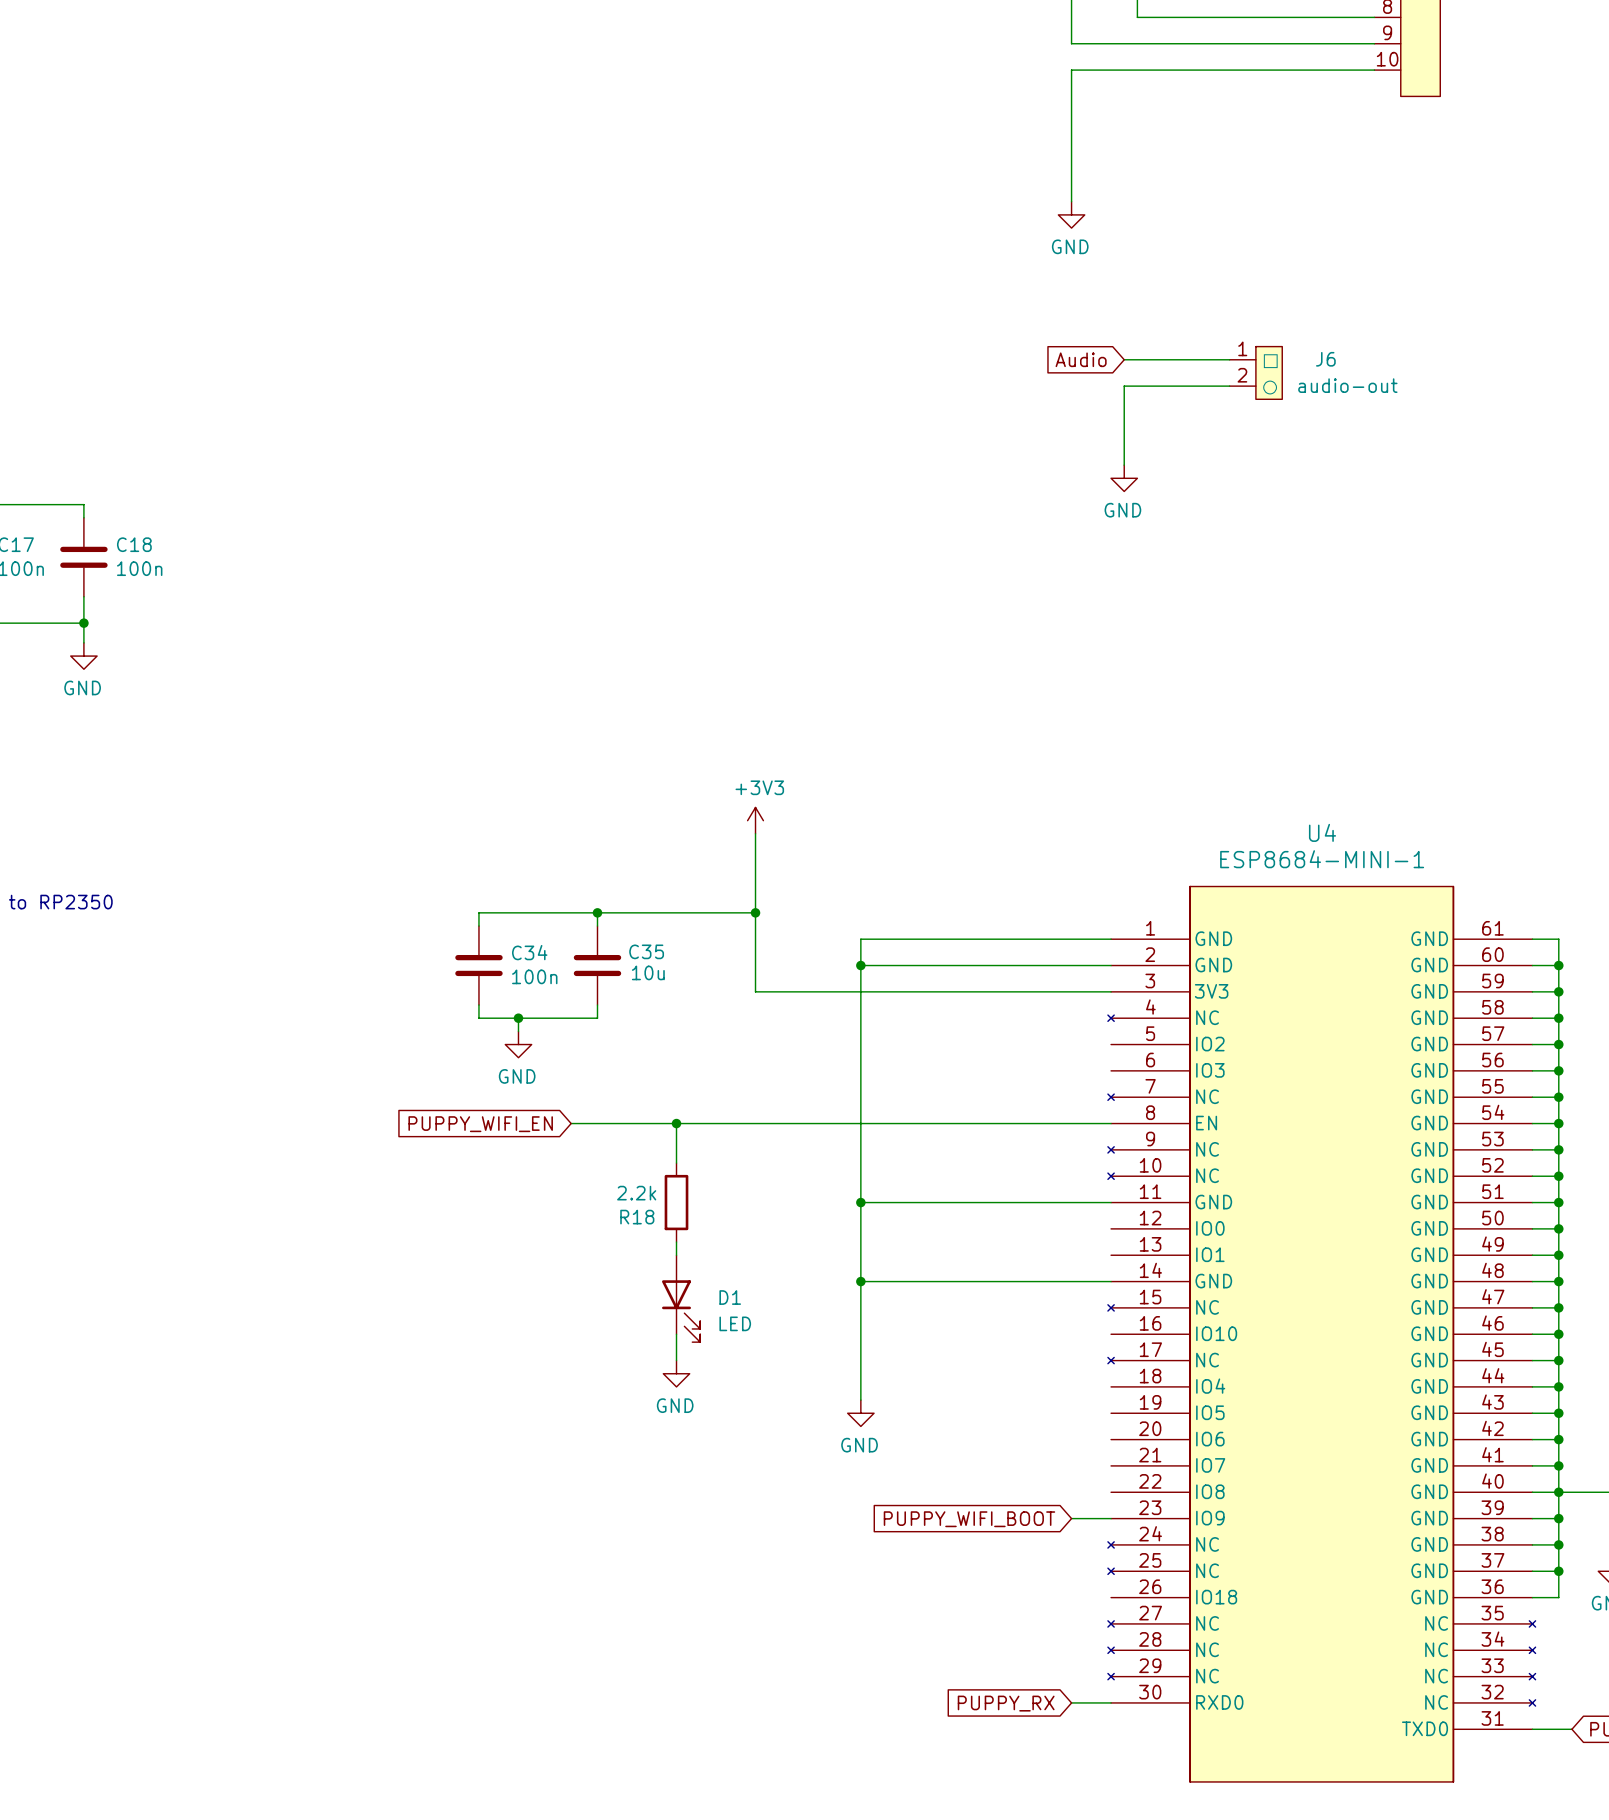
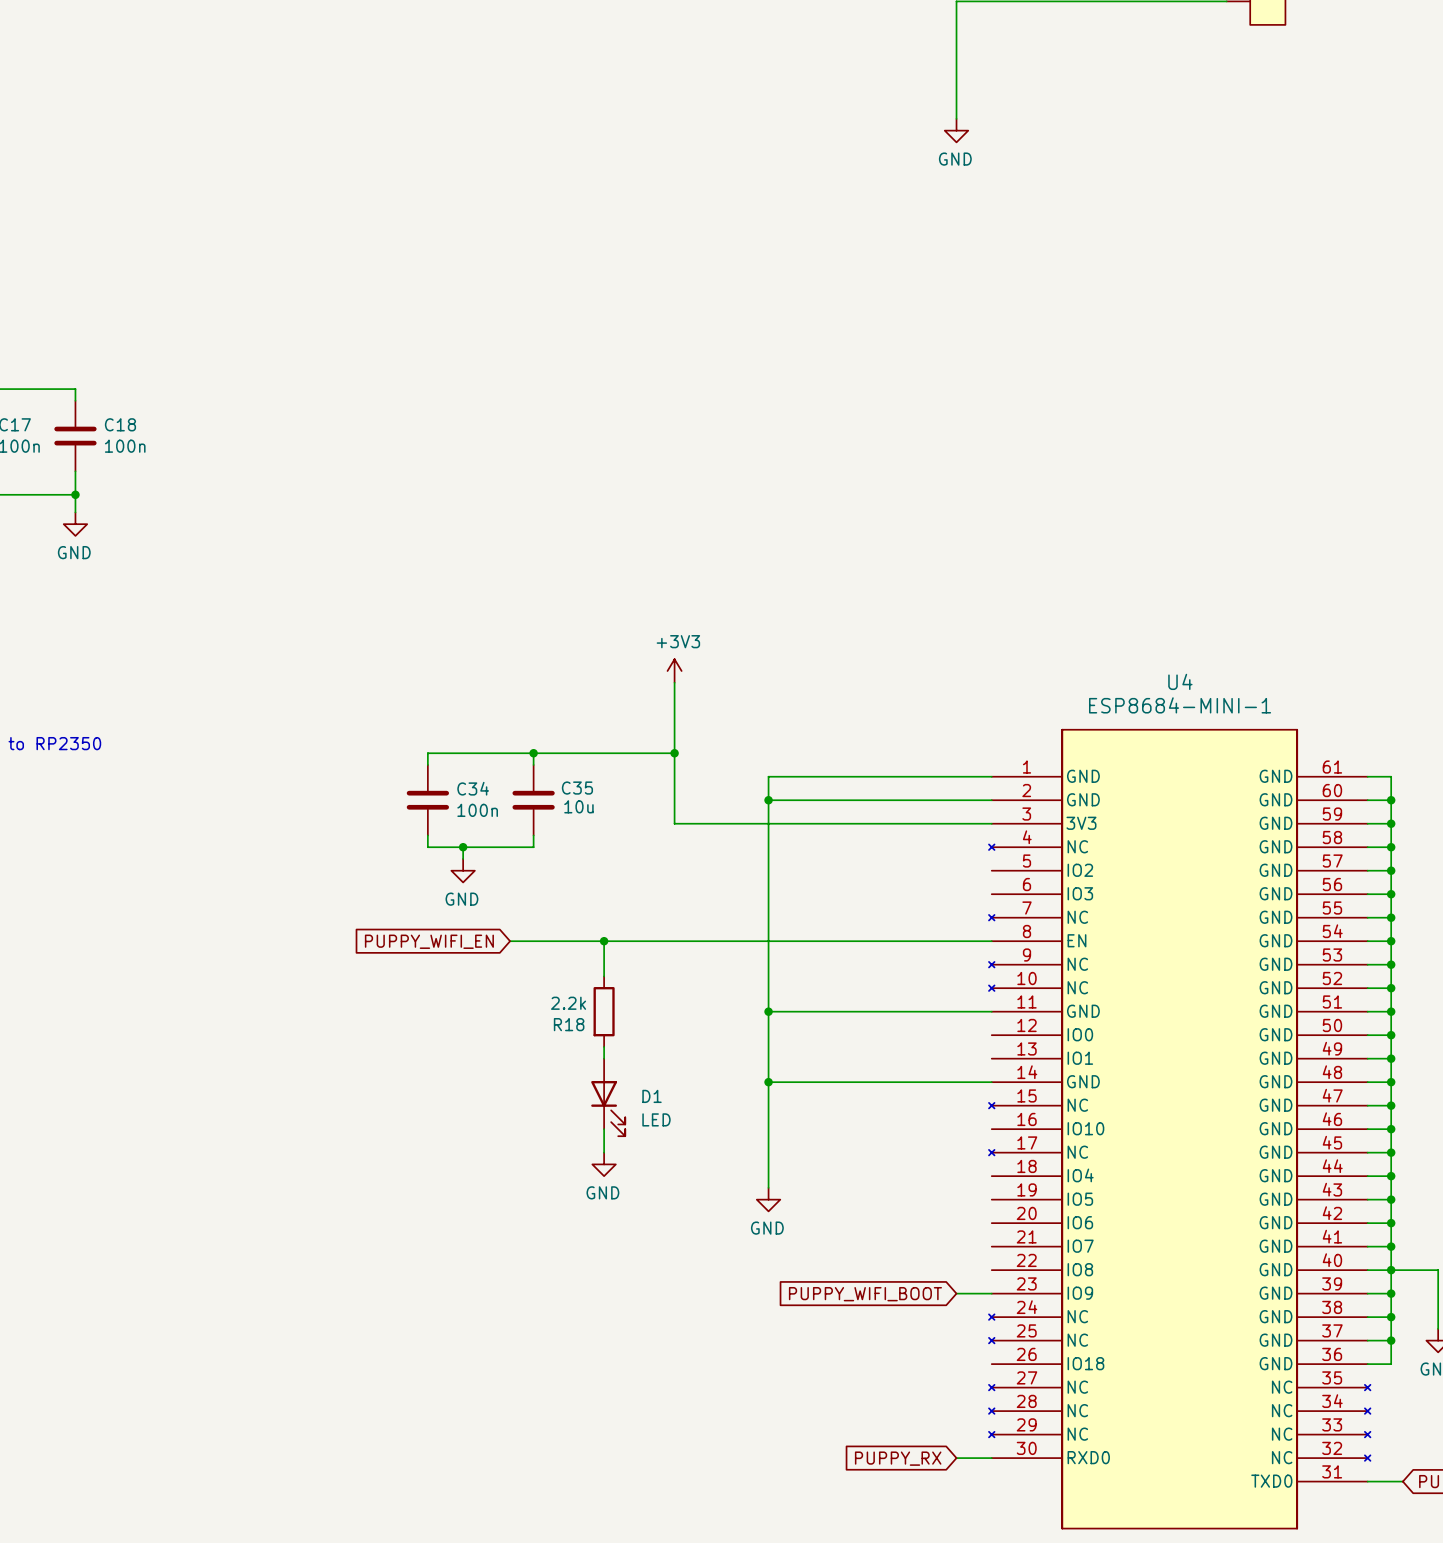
global label: Audio (1081, 359) -> none
wire: (1124, 359) (1229, 359) -> none
J6: audio-out (1255, 372) -> none
wire: (1229, 386) (1124, 386) (1124, 465) -> none
power symbol: GND (1124, 478) -> none

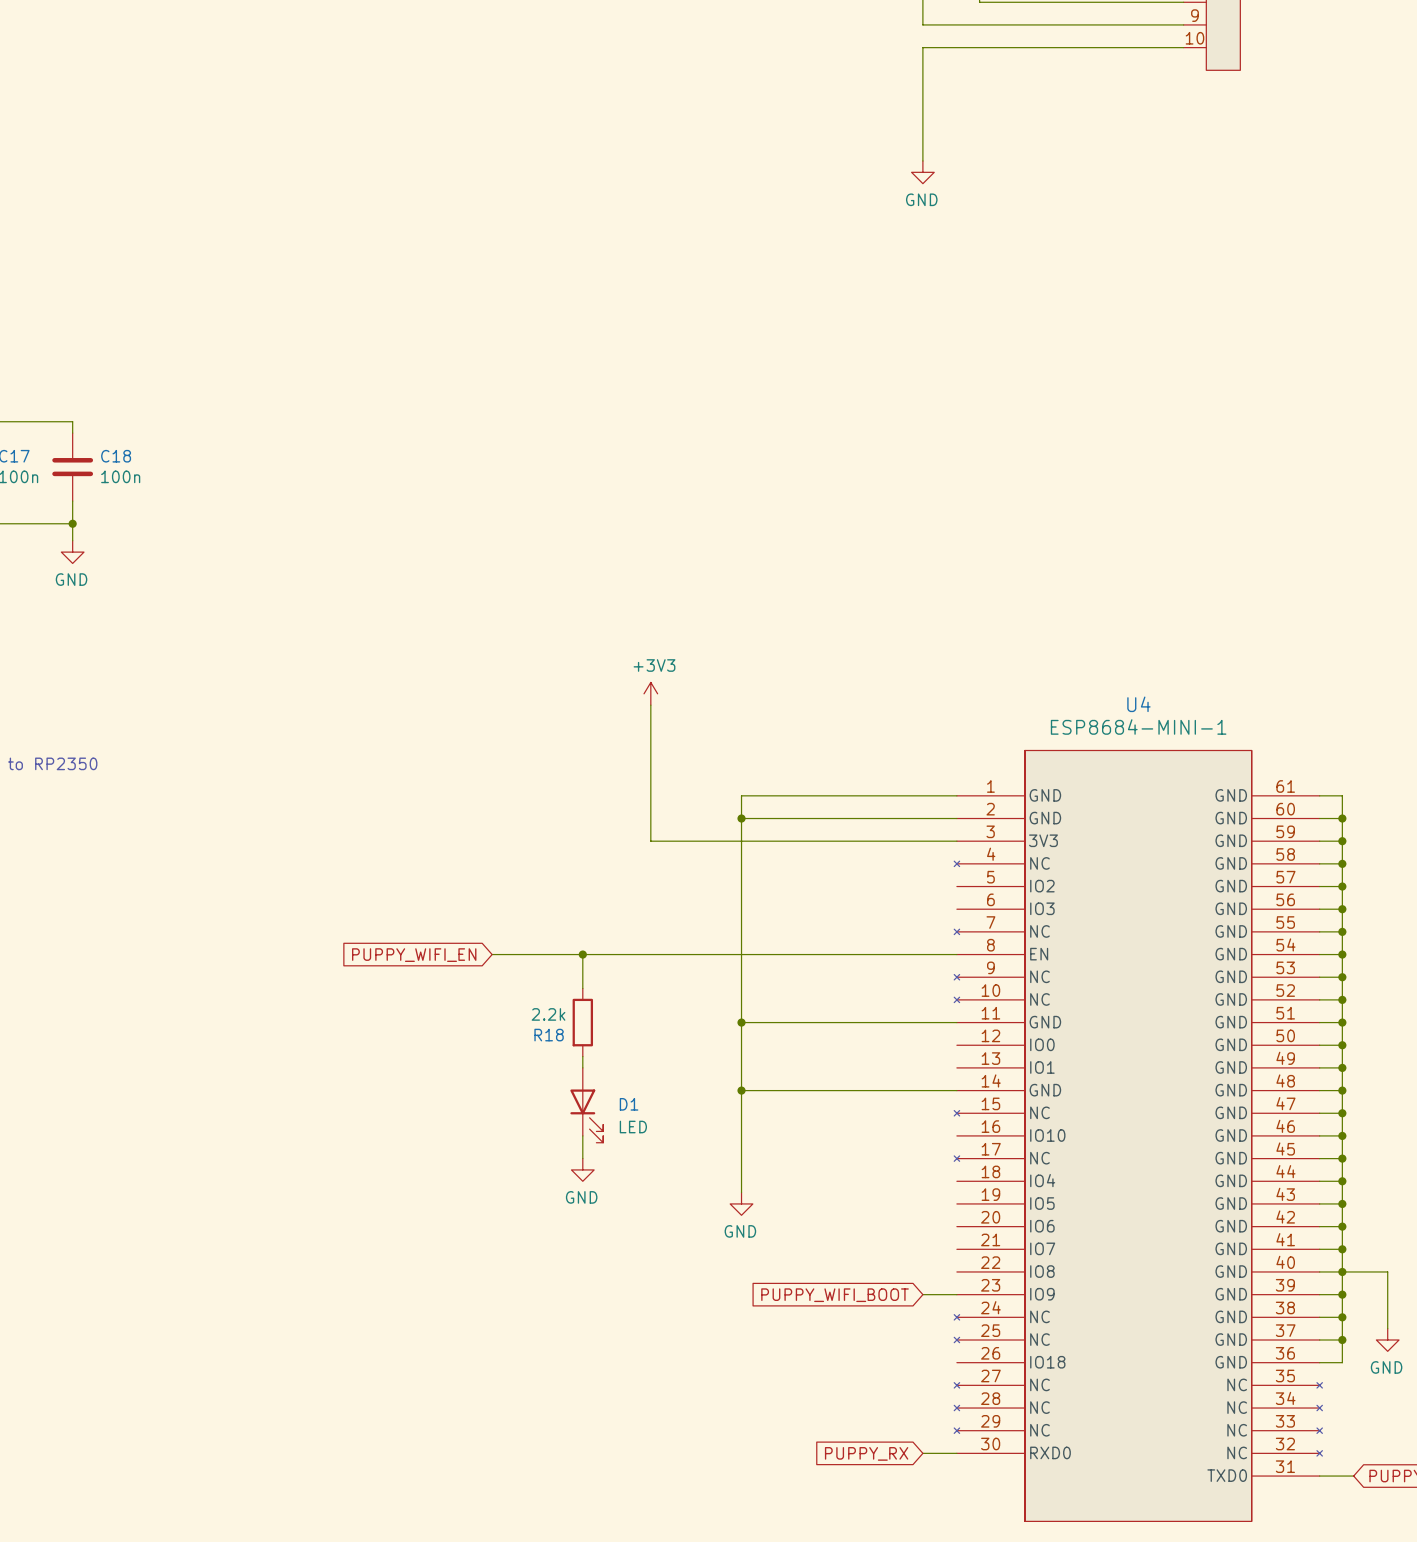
wire: (533, 753) (533, 764) -> none
junction: (533, 753) -> none
wire: (674, 753) (427, 753) (427, 764) -> none
junction: (674, 753) -> none
C34: 100n (427, 800) -> none
C35: 10u (533, 800) -> none
wire: (427, 835) (427, 847) (533, 847) (533, 835) -> none
wire: (463, 847) (463, 858) -> none
junction: (463, 847) -> none
power symbol: GND (463, 870) -> none

